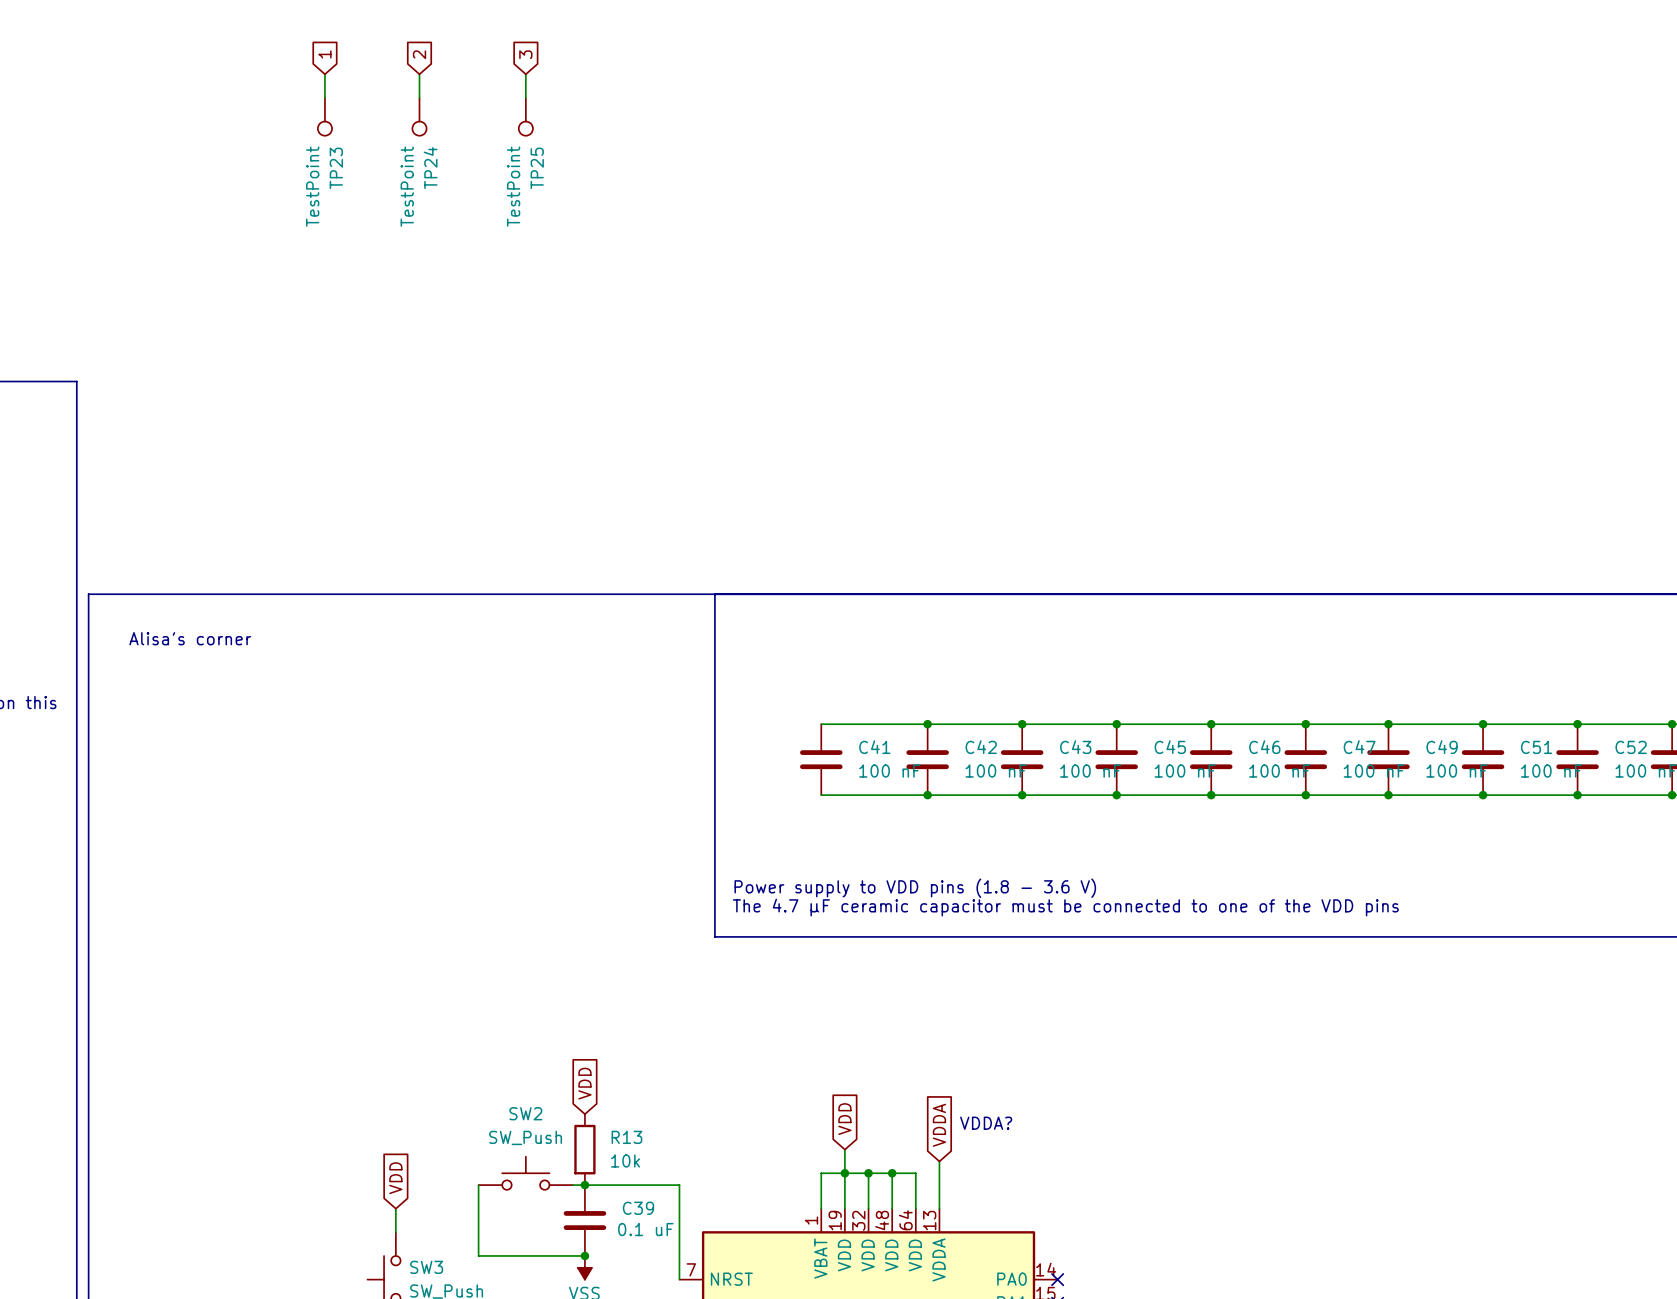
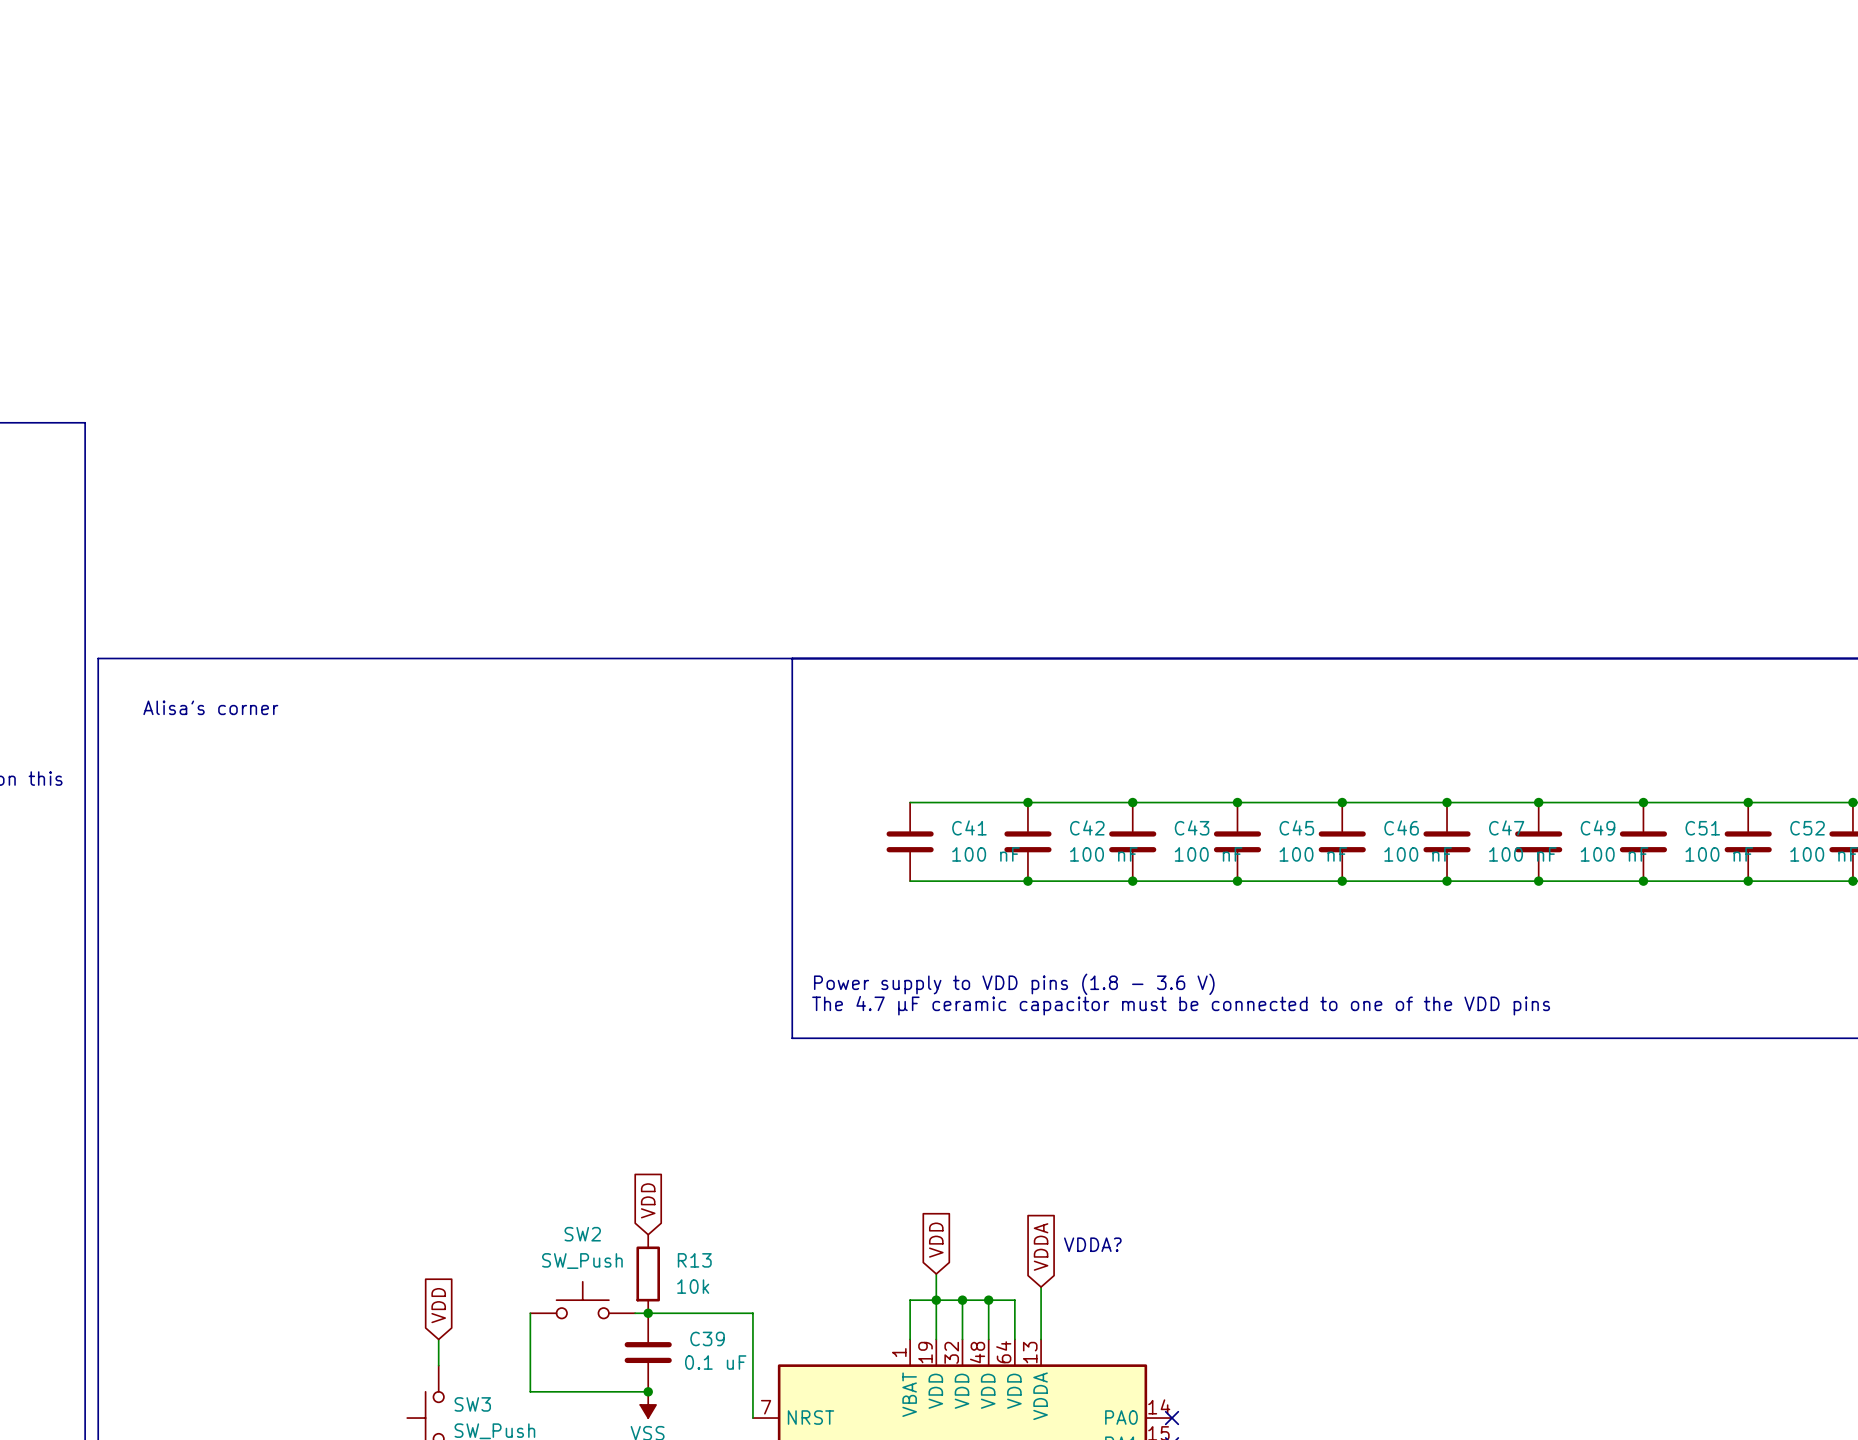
global label: 1 (324, 54) -> none
global label: 2 (419, 54) -> none
global label: 3 (525, 54) -> none
wire: (324, 74) (324, 97) -> none
wire: (419, 74) (419, 97) -> none
wire: (525, 74) (525, 97) -> none
TP23: TestPoint (324, 116) -> none
TP24: TestPoint (419, 116) -> none
TP25: TestPoint (525, 116) -> none

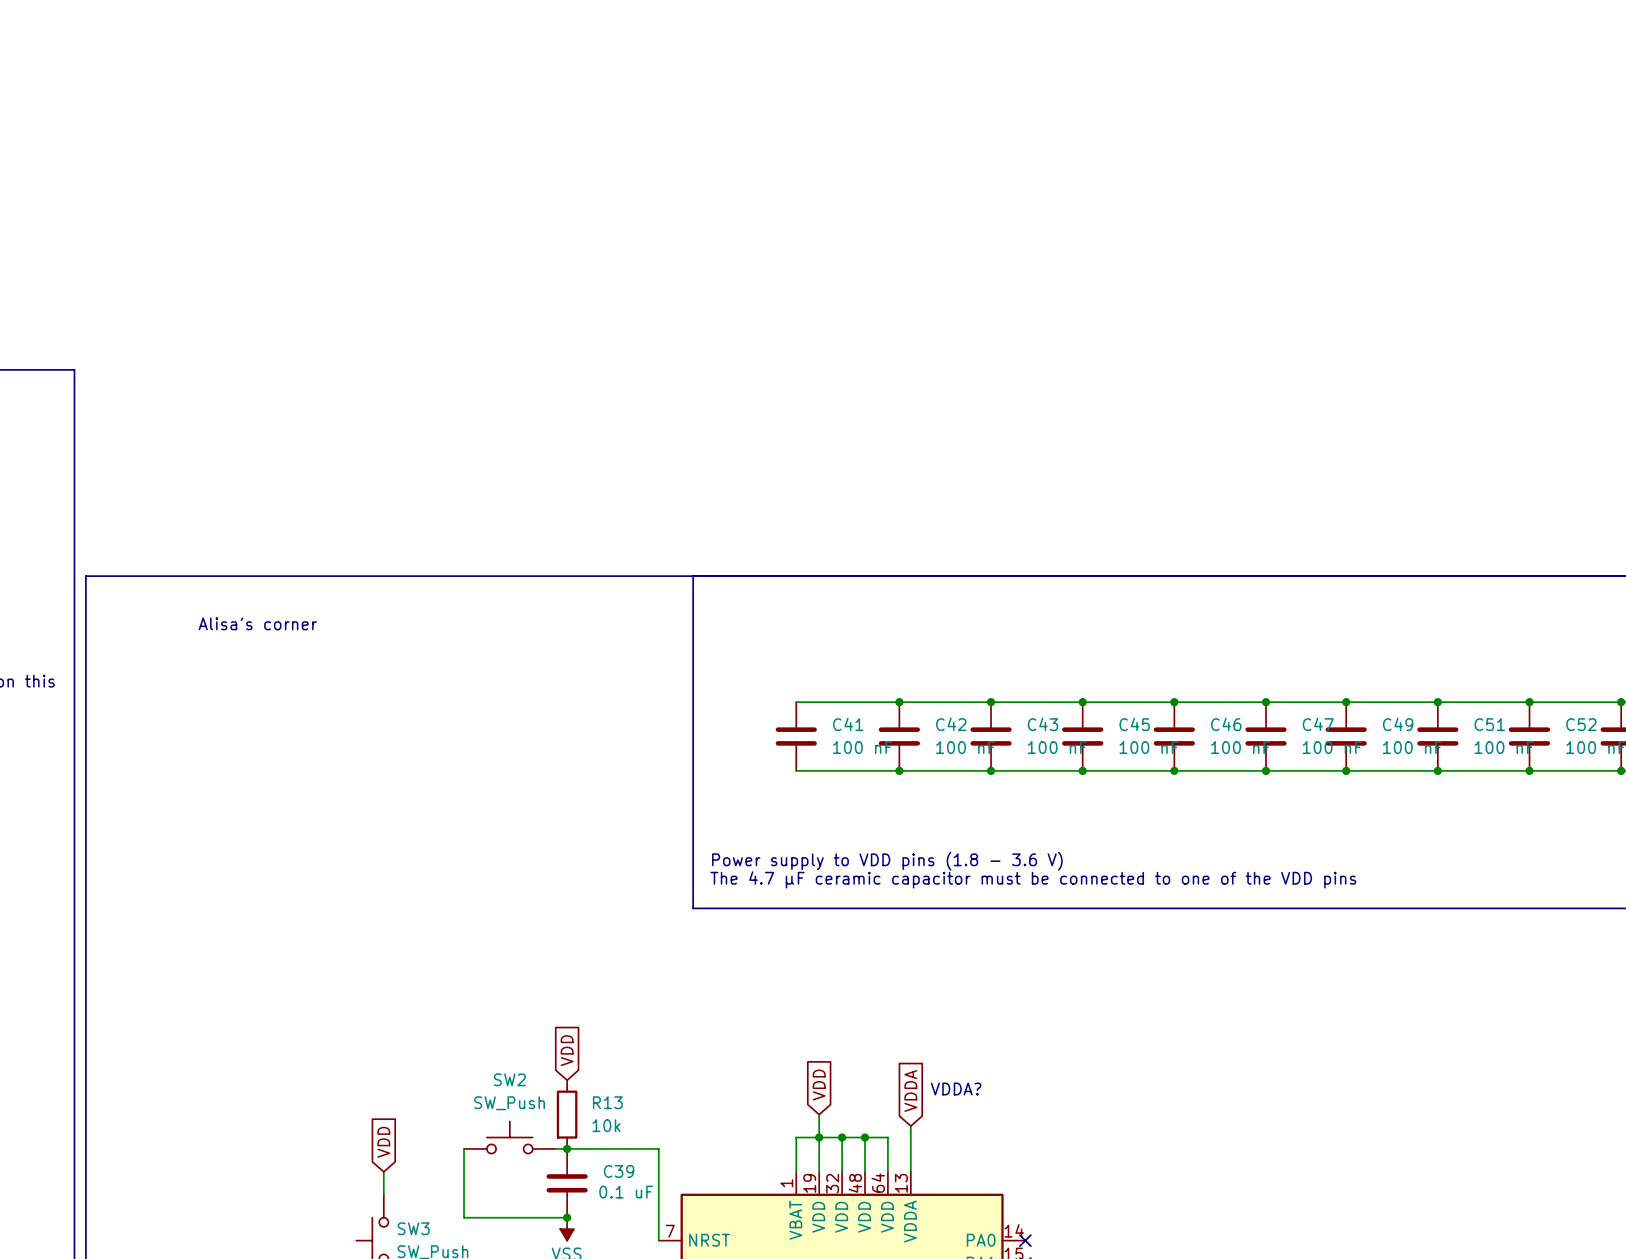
text position: Alisa's corner (210, 707) -> Alisa's corner (257, 623)

